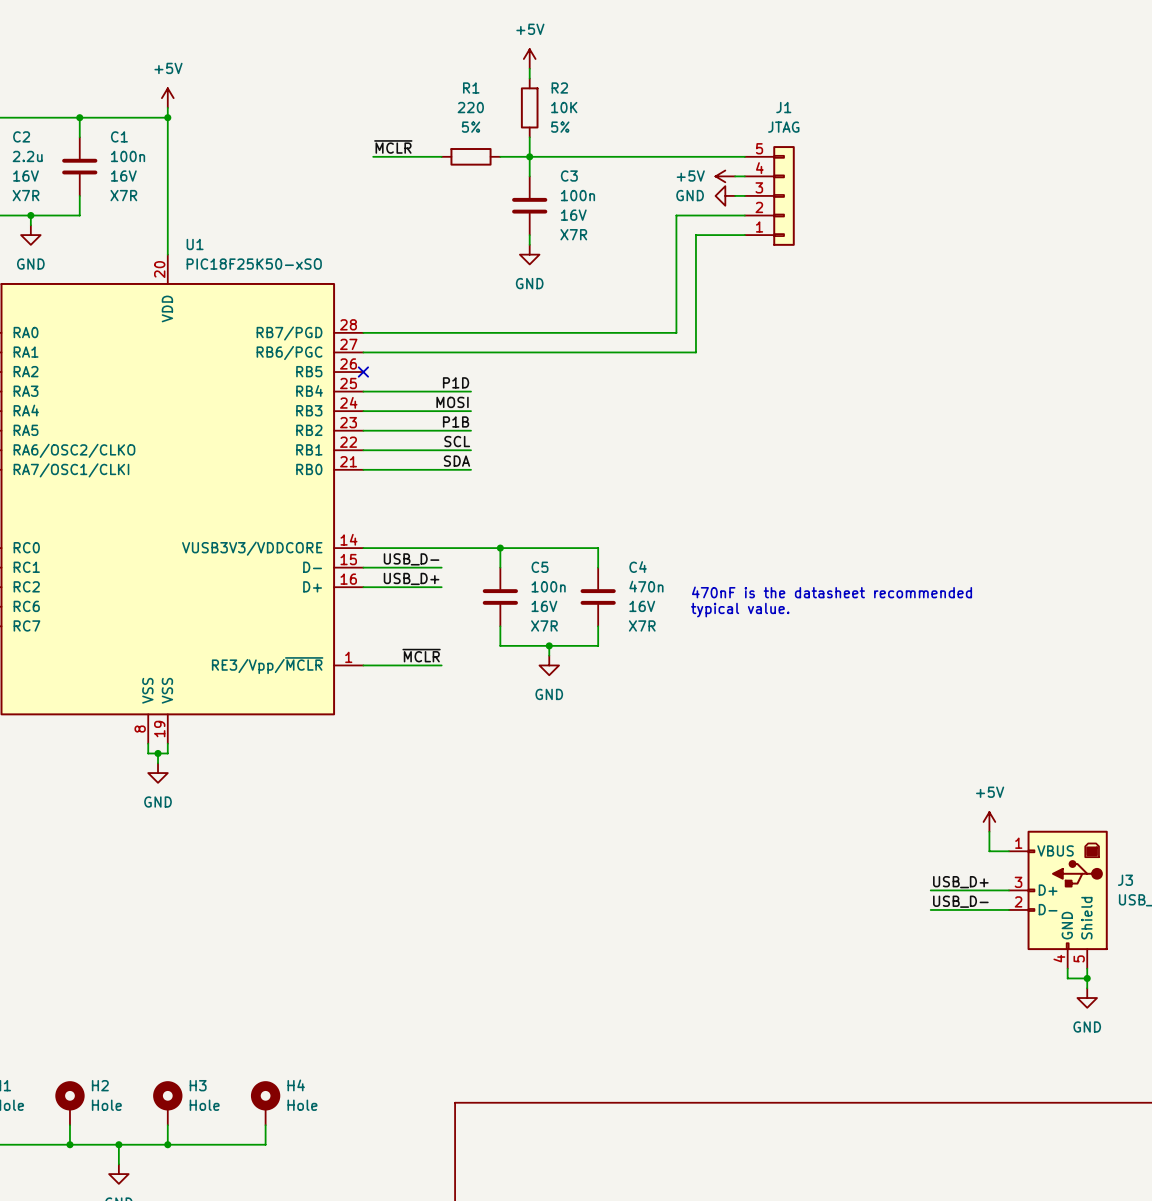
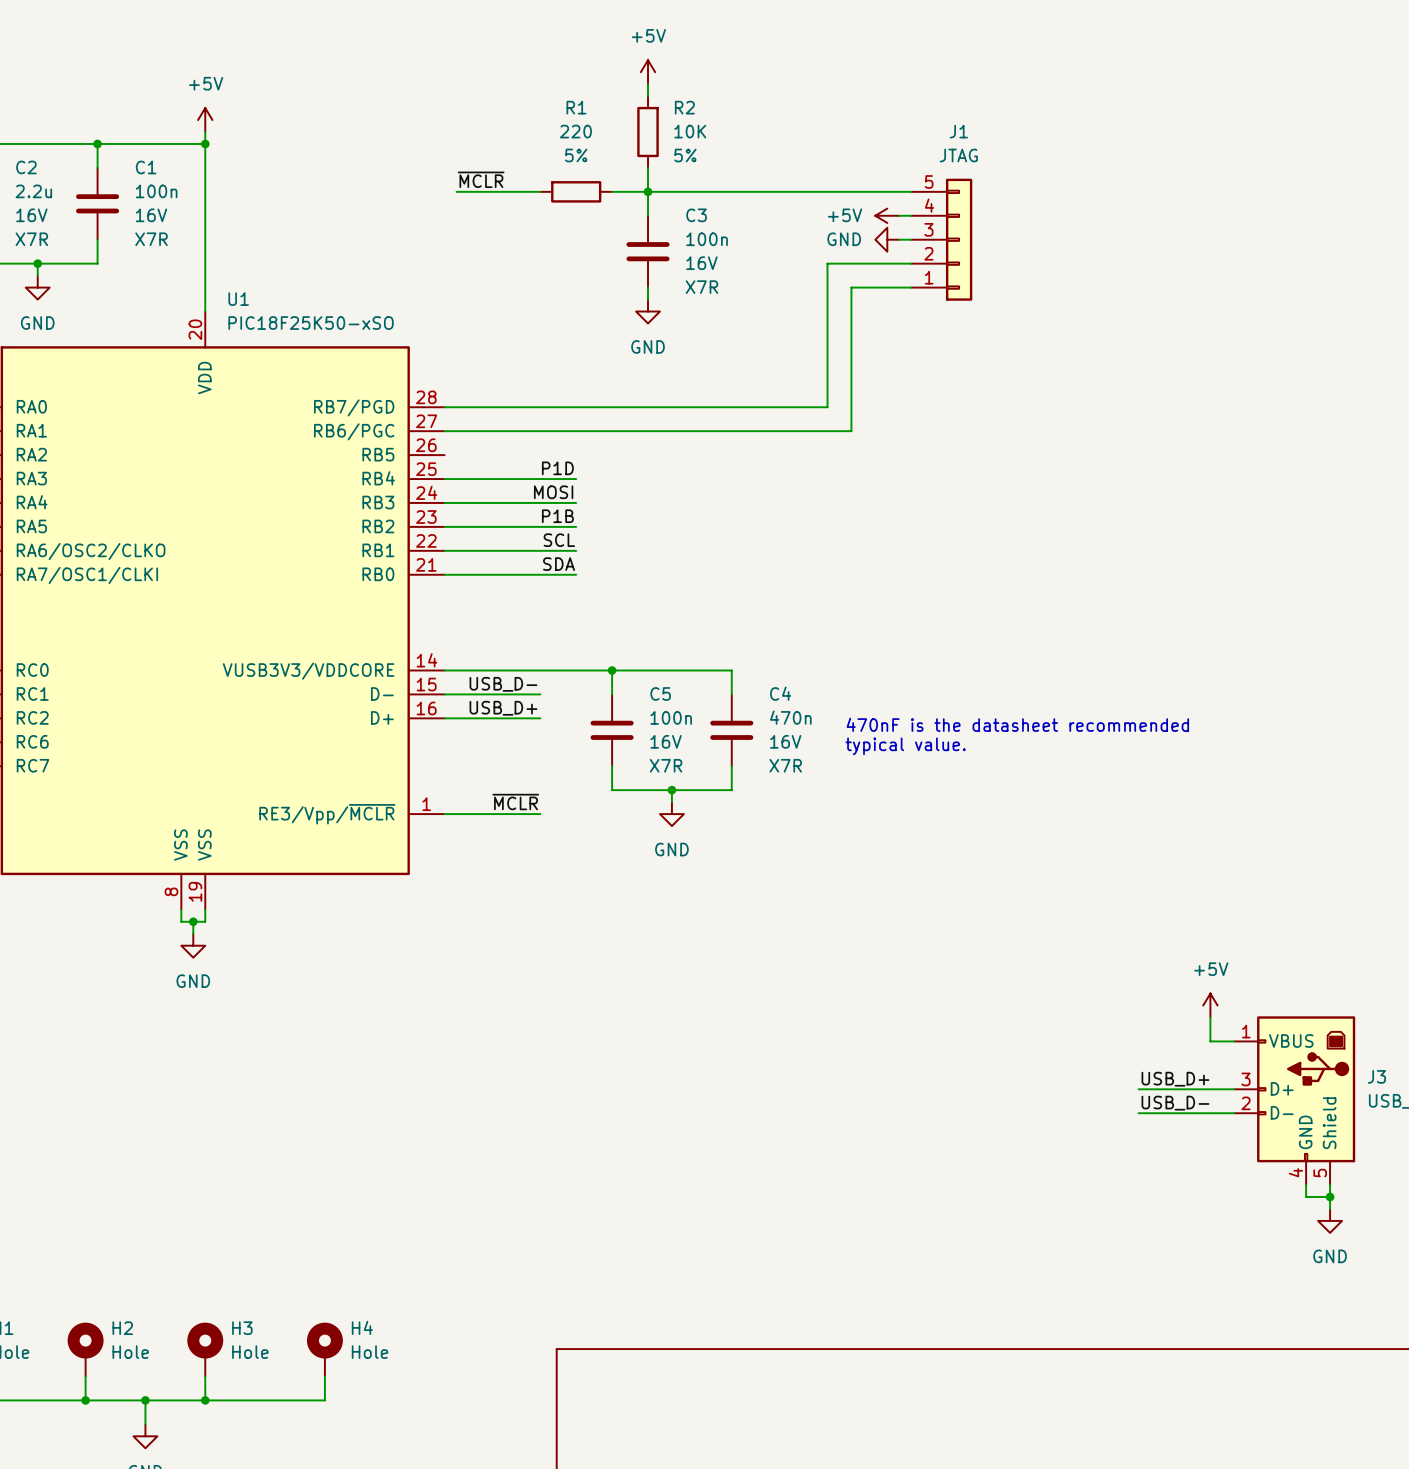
no-connect mark: (363, 372) -> none

